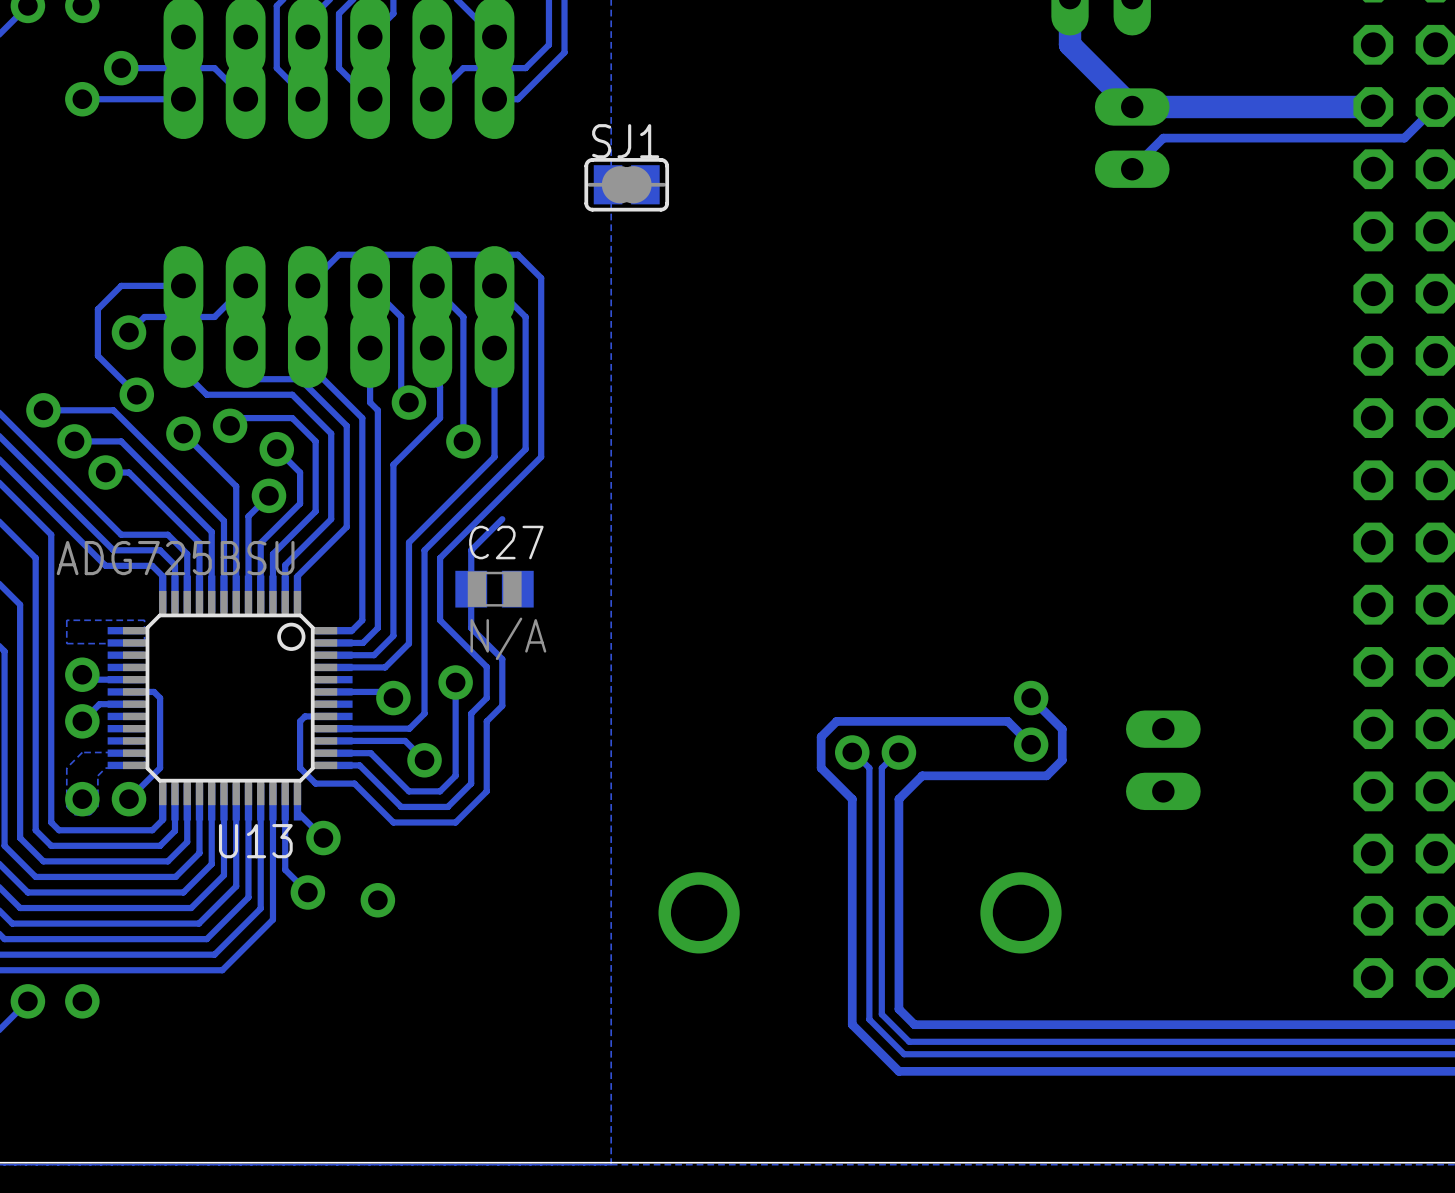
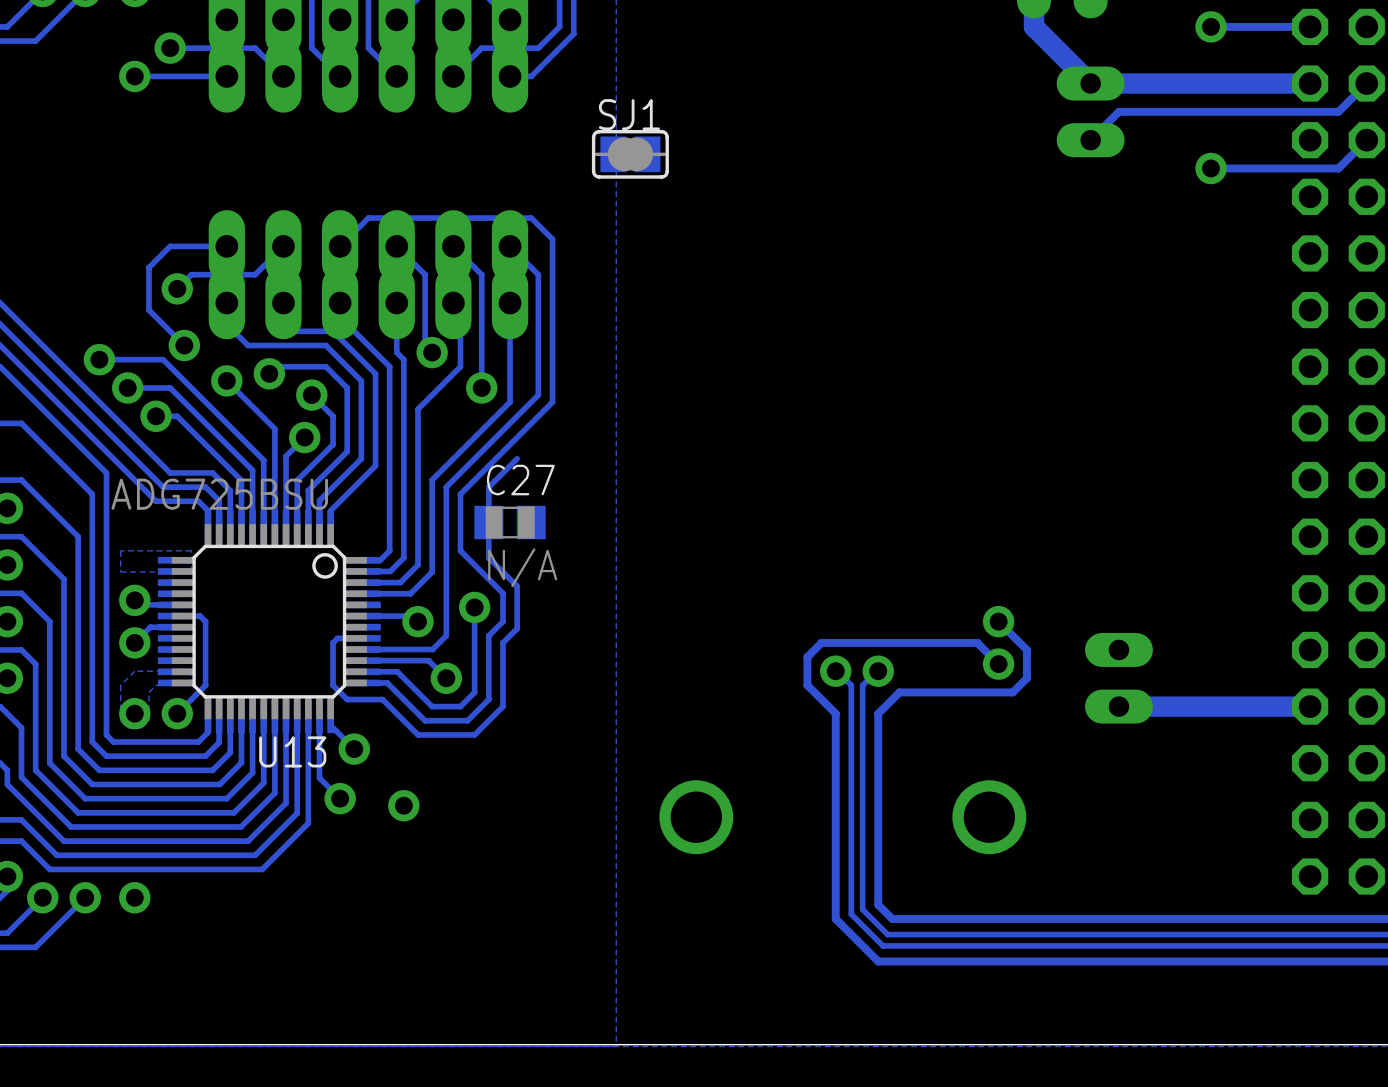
via: none -> (1211, 26)
track: none -> (1310, 26) (1211, 26)
track: none -> (1366, 140) (1338, 168) (1211, 168)
via: none -> (1211, 168)
track: none -> (1310, 706) (1118, 706)

